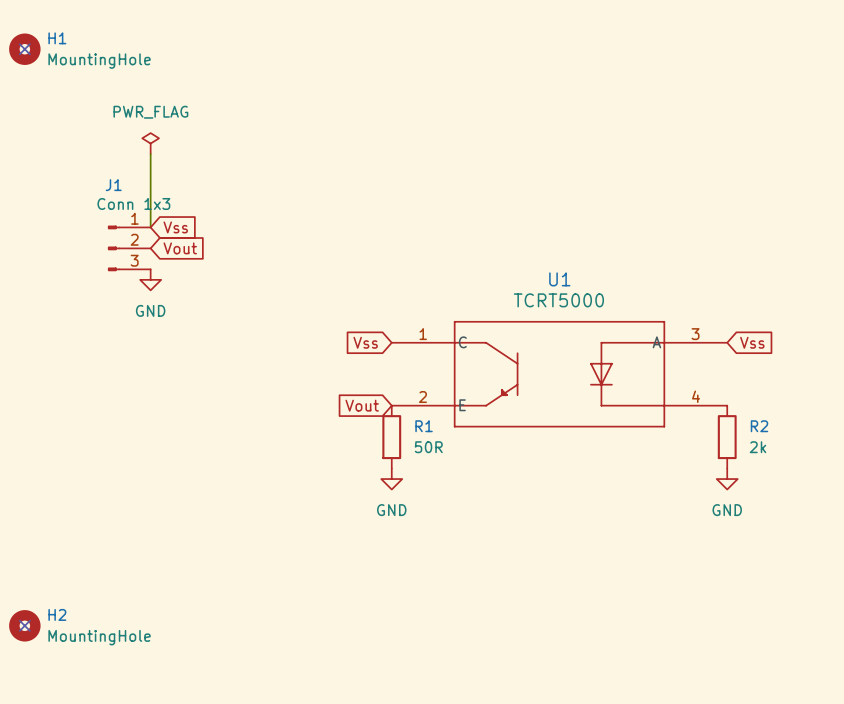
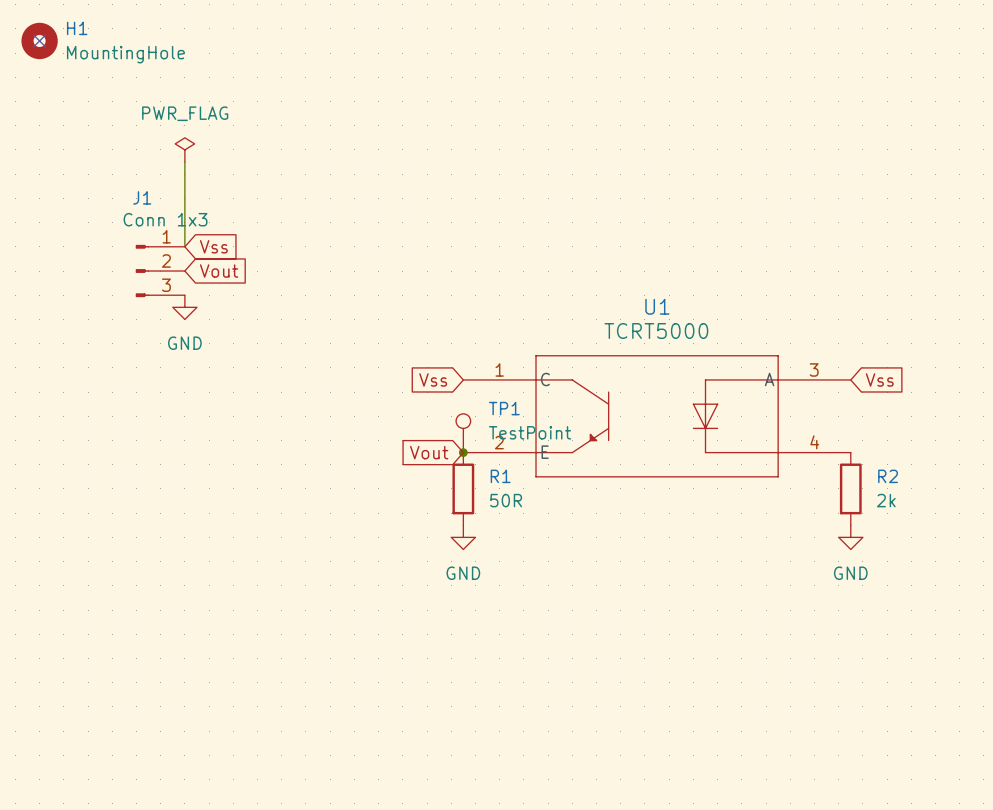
TP1: none -> TestPoint (463, 433)
junction: none -> (463, 452)
no-connect mark: (24, 625) -> none
H2: MountingHole (24, 625) -> none

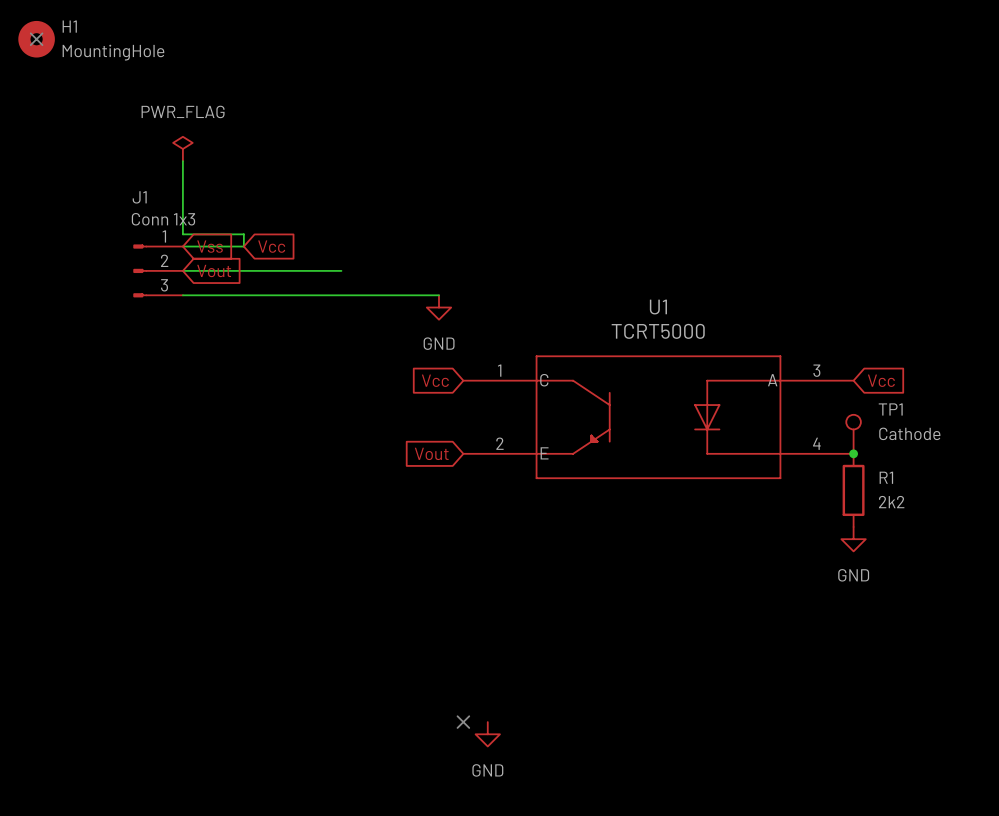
wire: (184, 234) (184, 246) -> (182, 234) (243, 234) (243, 246) (182, 246)
global label: none -> Vcc (271, 246)
wire: none -> (182, 270) (341, 270)
wire: none -> (182, 295) (439, 295)
power symbol: GND (184, 307) -> none
power symbol: none -> GND (439, 307)
global label: Vss (433, 379) -> Vcc (435, 380)
global label: Vss (879, 379) -> Vcc (881, 380)
TP1 value: TestPoint (530, 432) -> Cathode (909, 433)
TP1 position: (463, 433) -> (853, 434)
junction: (463, 452) -> none
junction: none -> (853, 453)
R2 name: R2 (888, 476) -> R1 (886, 477)
R1: 50R (463, 488) -> none
R2 value: 2k (886, 500) -> 2k2 (891, 502)
power symbol: GND (463, 537) -> none
no-connect mark: none -> (463, 722)
power symbol: none -> GND (487, 734)

